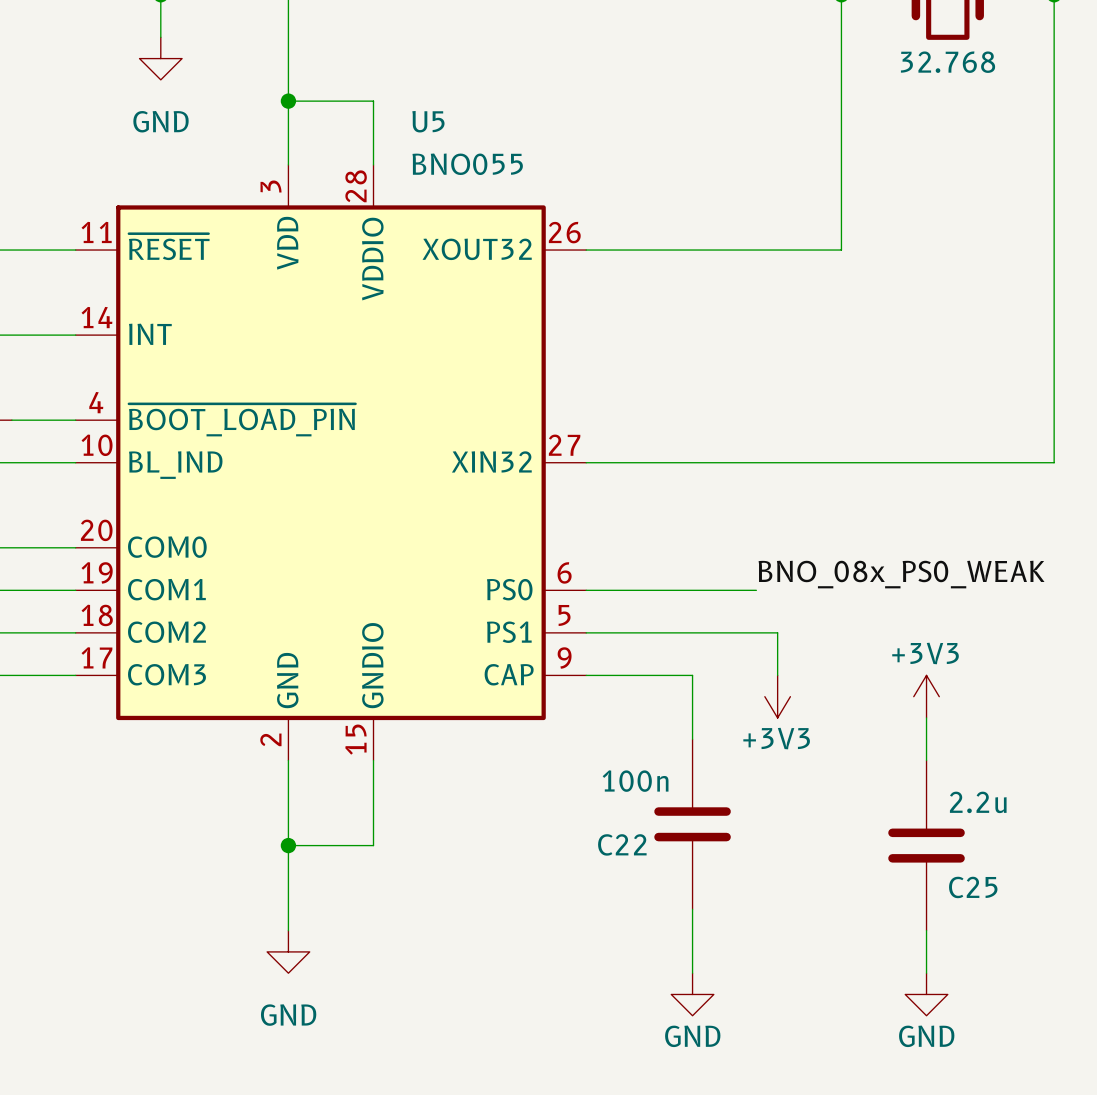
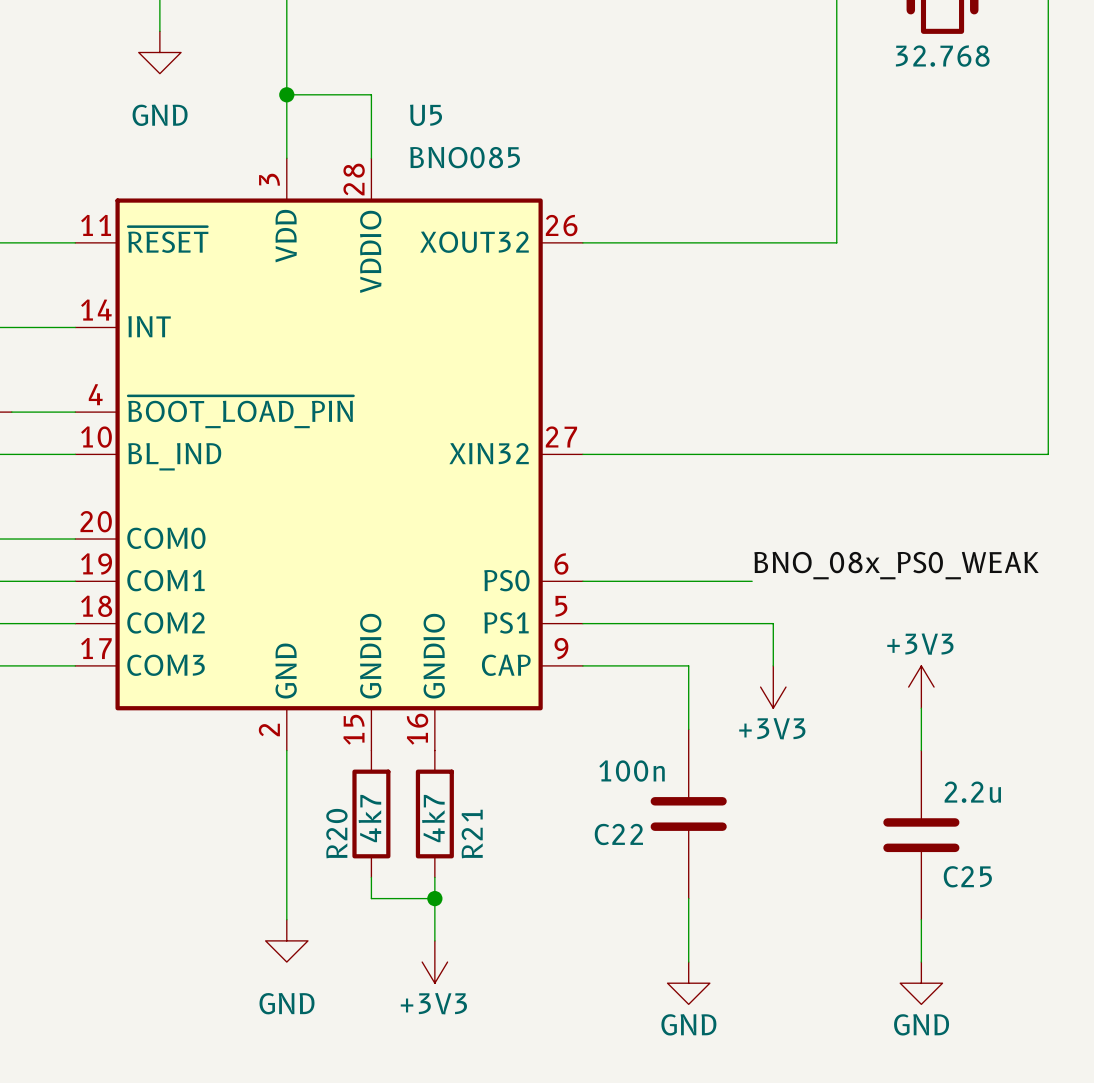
U5 symbol: [75, 164, 587, 761] -> [75, 158, 583, 751]
U5 value: BNO055 (467, 164) -> BNO085 (465, 157)
wire: (373, 760) (373, 845) (288, 845) -> none
R20: none -> 4k7 (371, 813)
R21: none -> 4k7 (434, 813)
junction: (288, 845) -> none
wire: none -> (371, 877) (371, 898) (434, 898)
wire: none -> (434, 877) (434, 940)
junction: none -> (434, 898)
power symbol: none -> +3V3 (434, 962)

